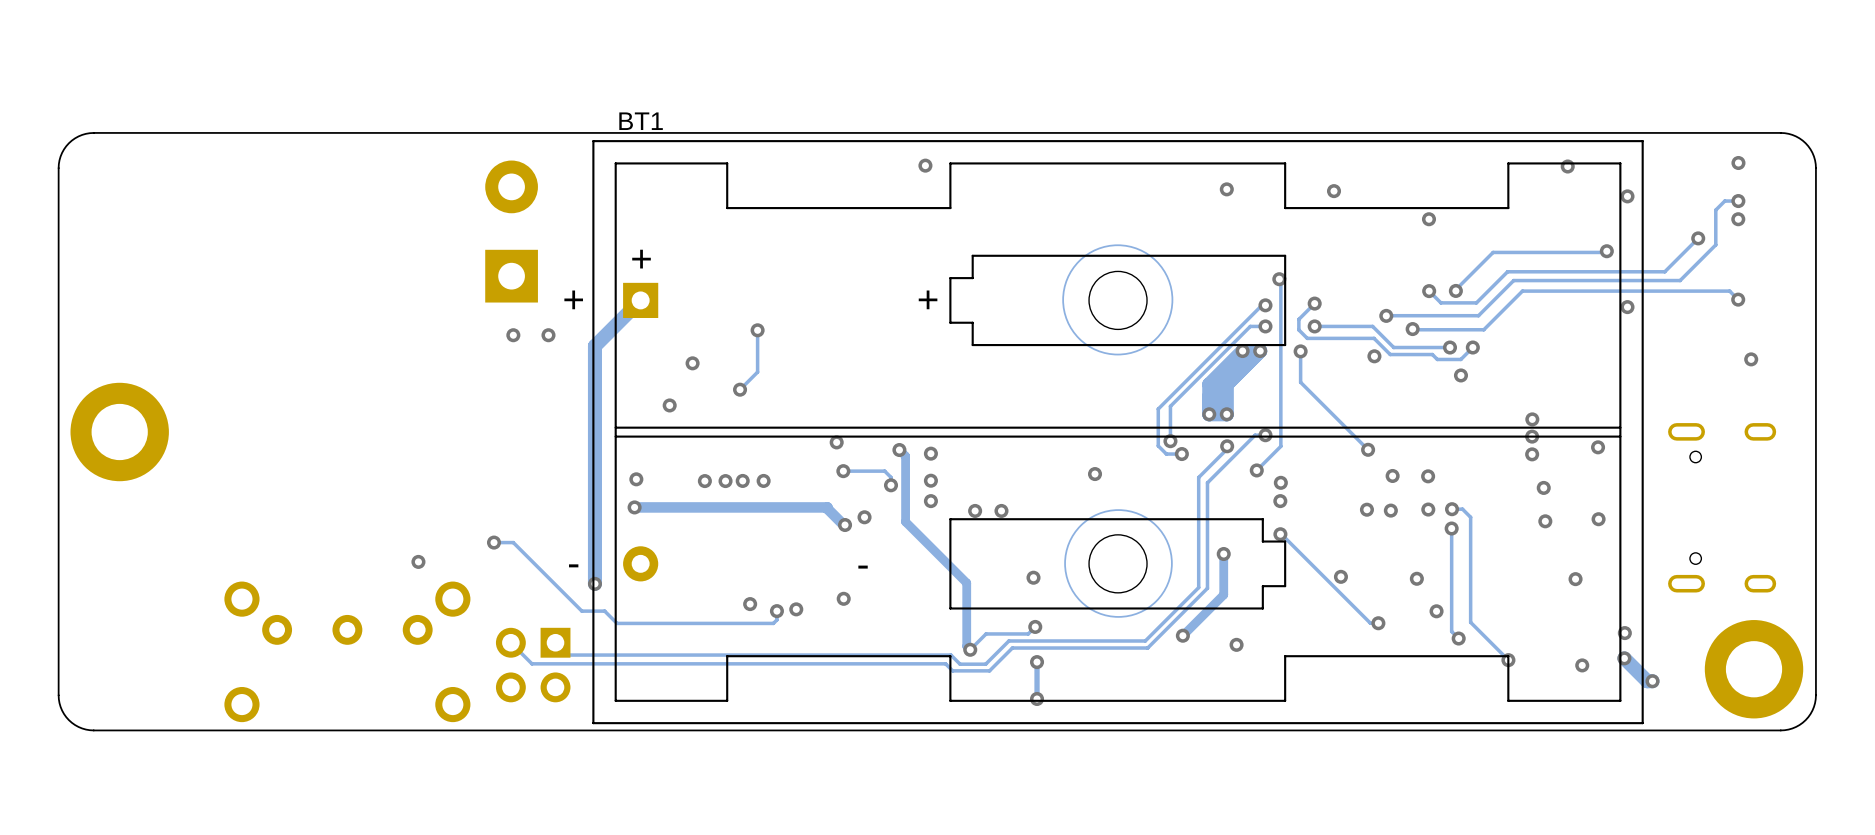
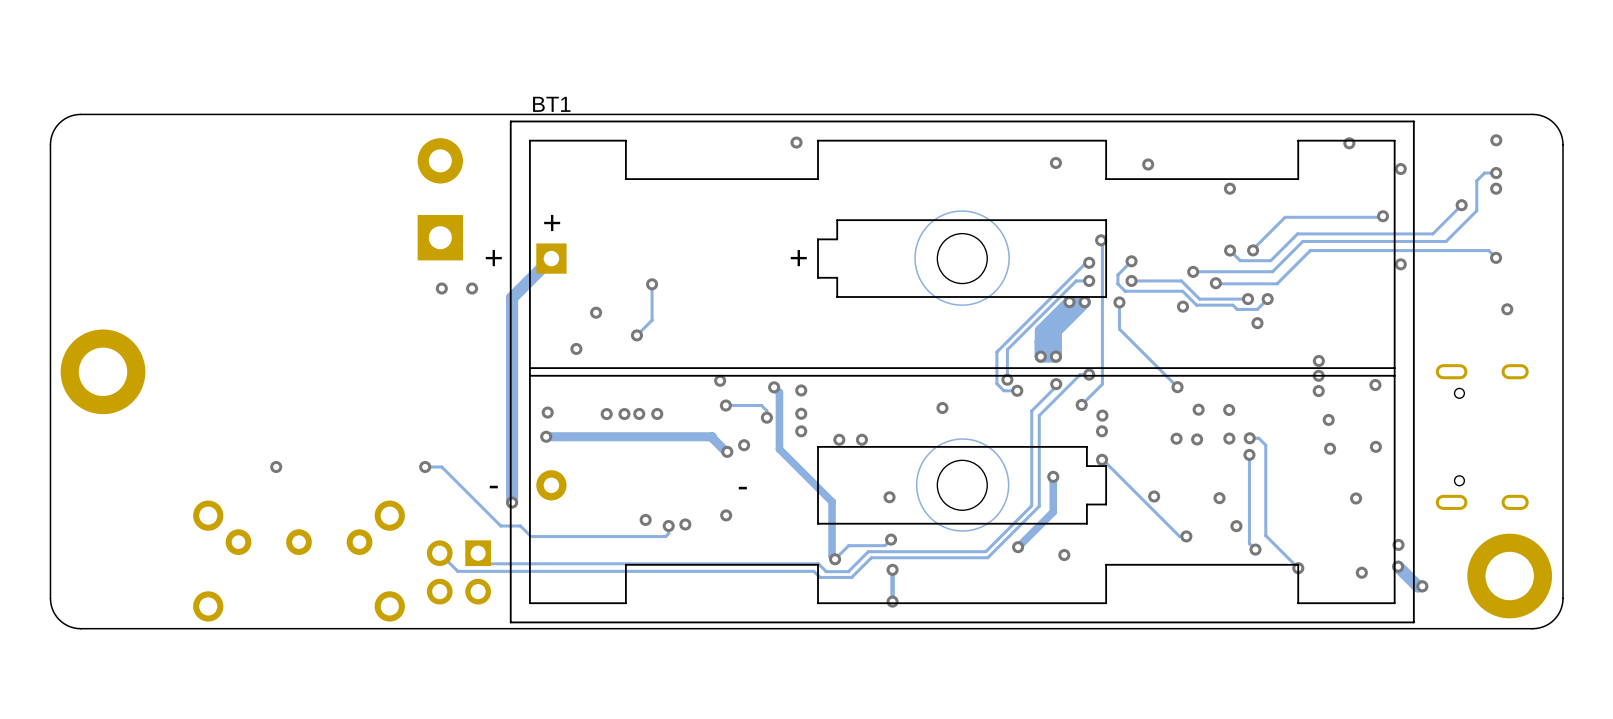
via position: (418, 561) -> (276, 467)

